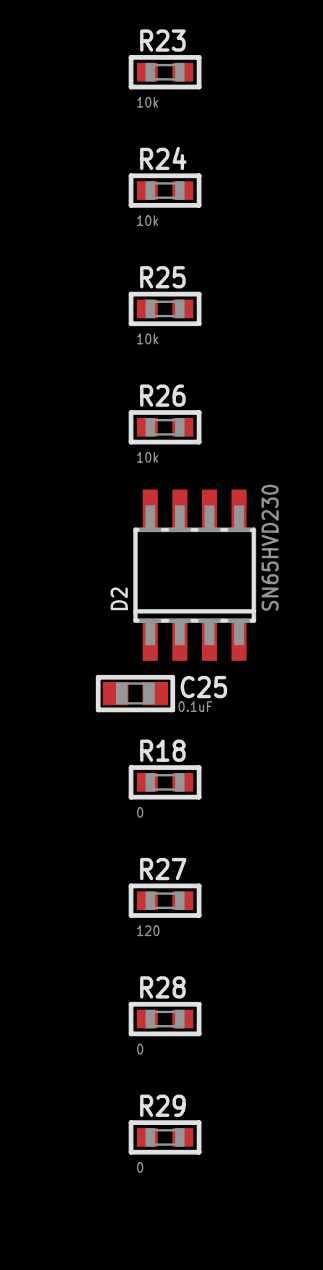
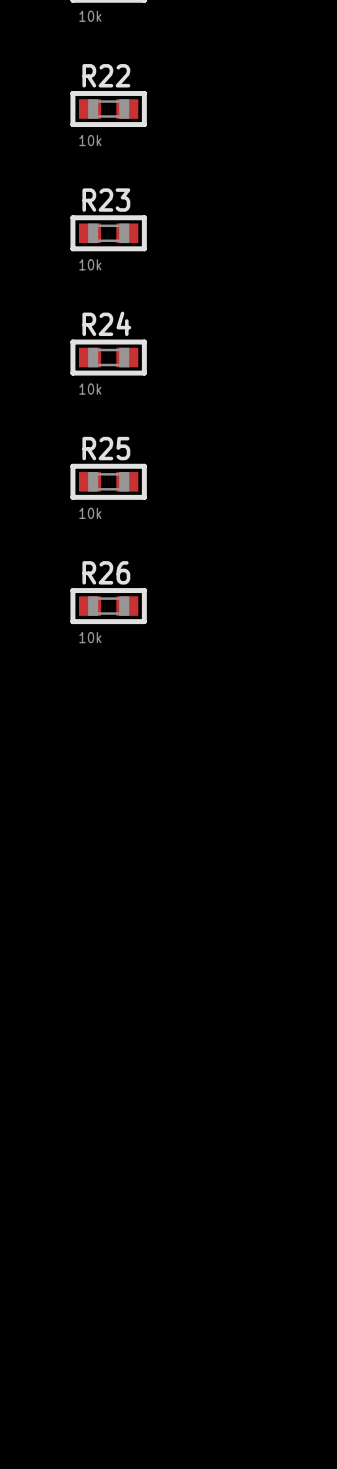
D2: SN65HVD230 (194, 575) -> none
C25: 0.1uF (135, 693) -> none
R18: 0 (165, 782) -> none
R27: 120 (165, 900) -> none
R28: 0 (165, 1019) -> none
R29: 0 (165, 1137) -> none

